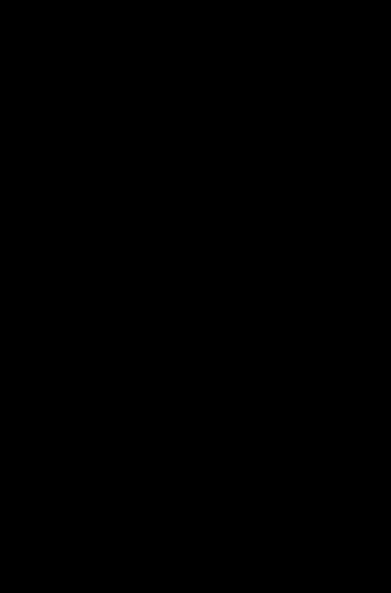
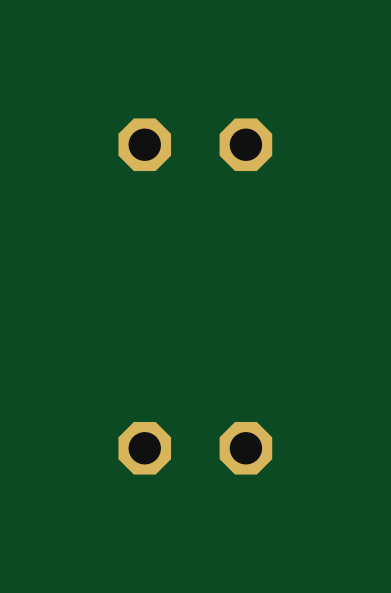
part: none -> (195, 144)
part: none -> (195, 448)

